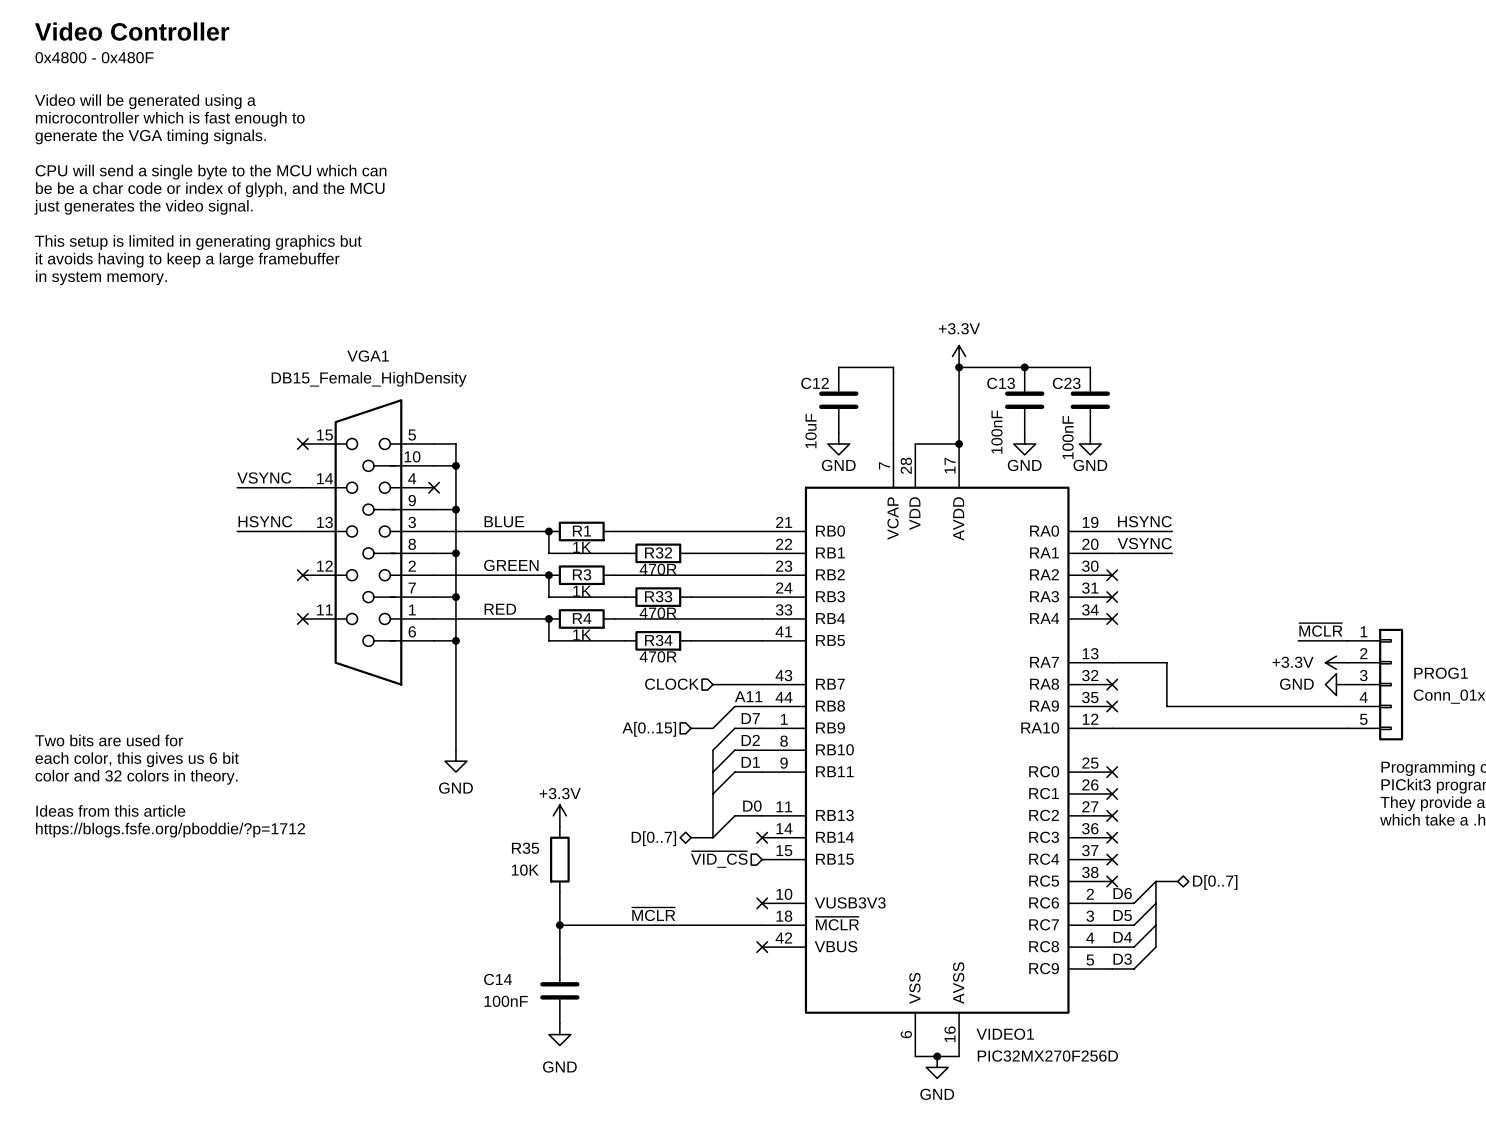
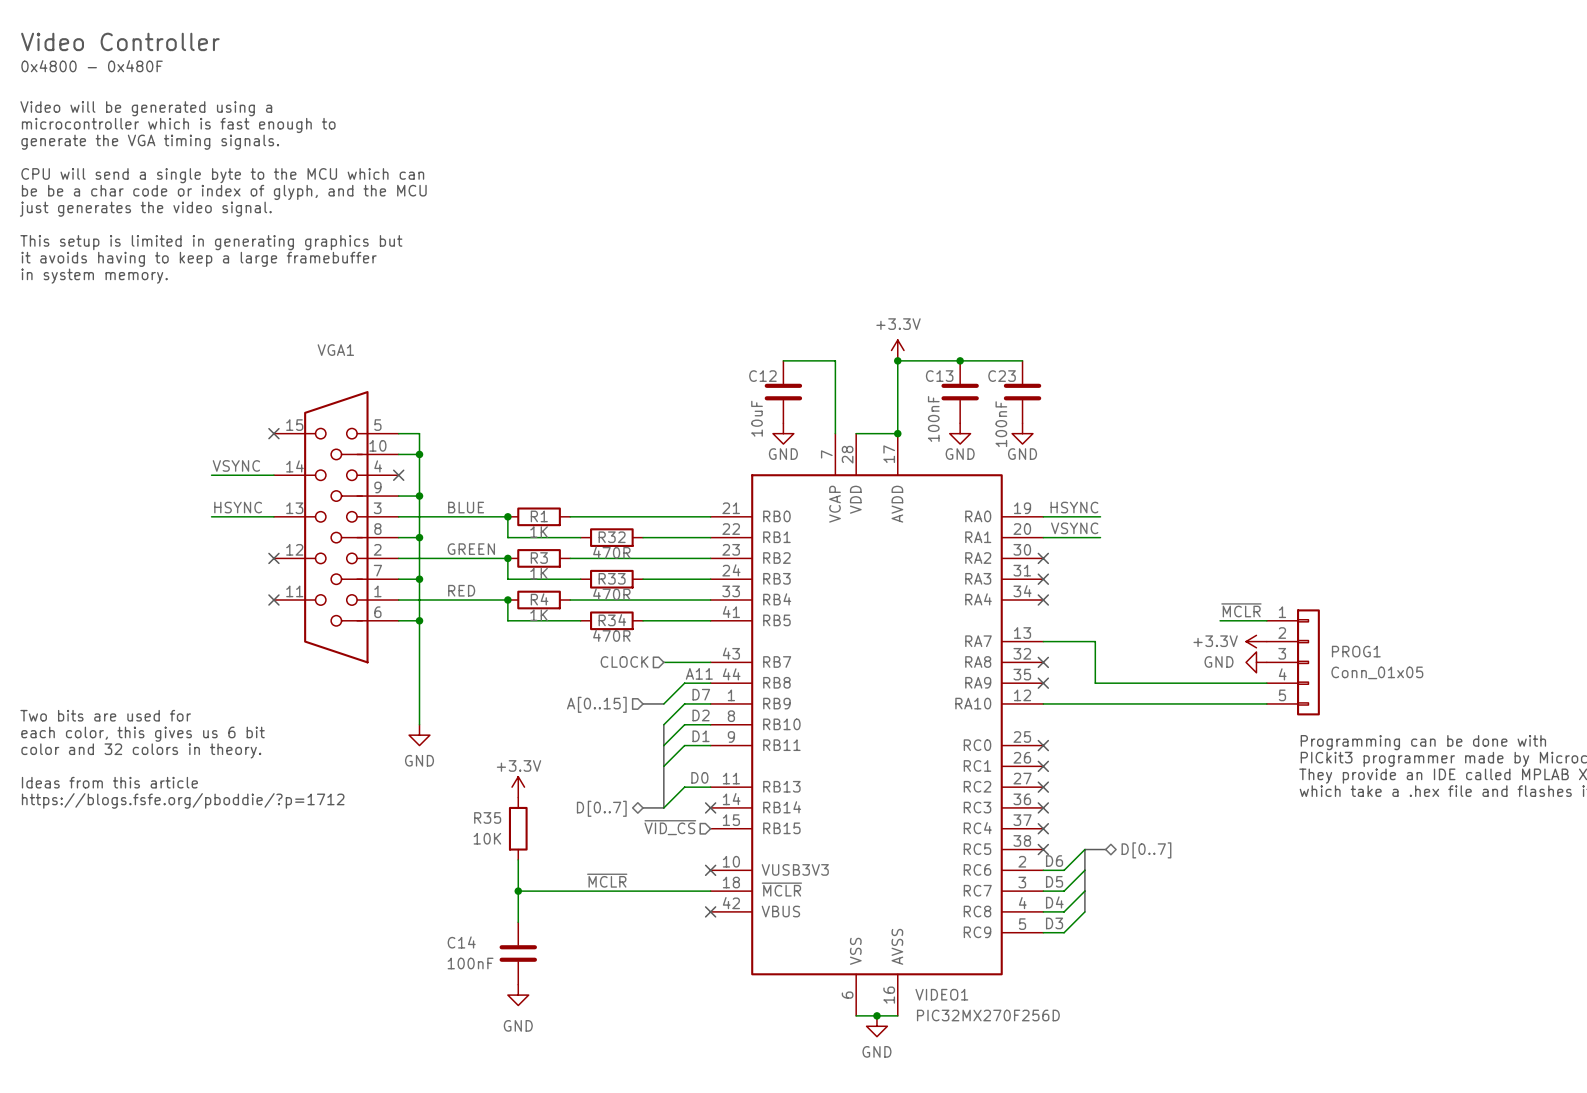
VGA1 value: DB15_Female_HighDensity (369, 379) -> none

